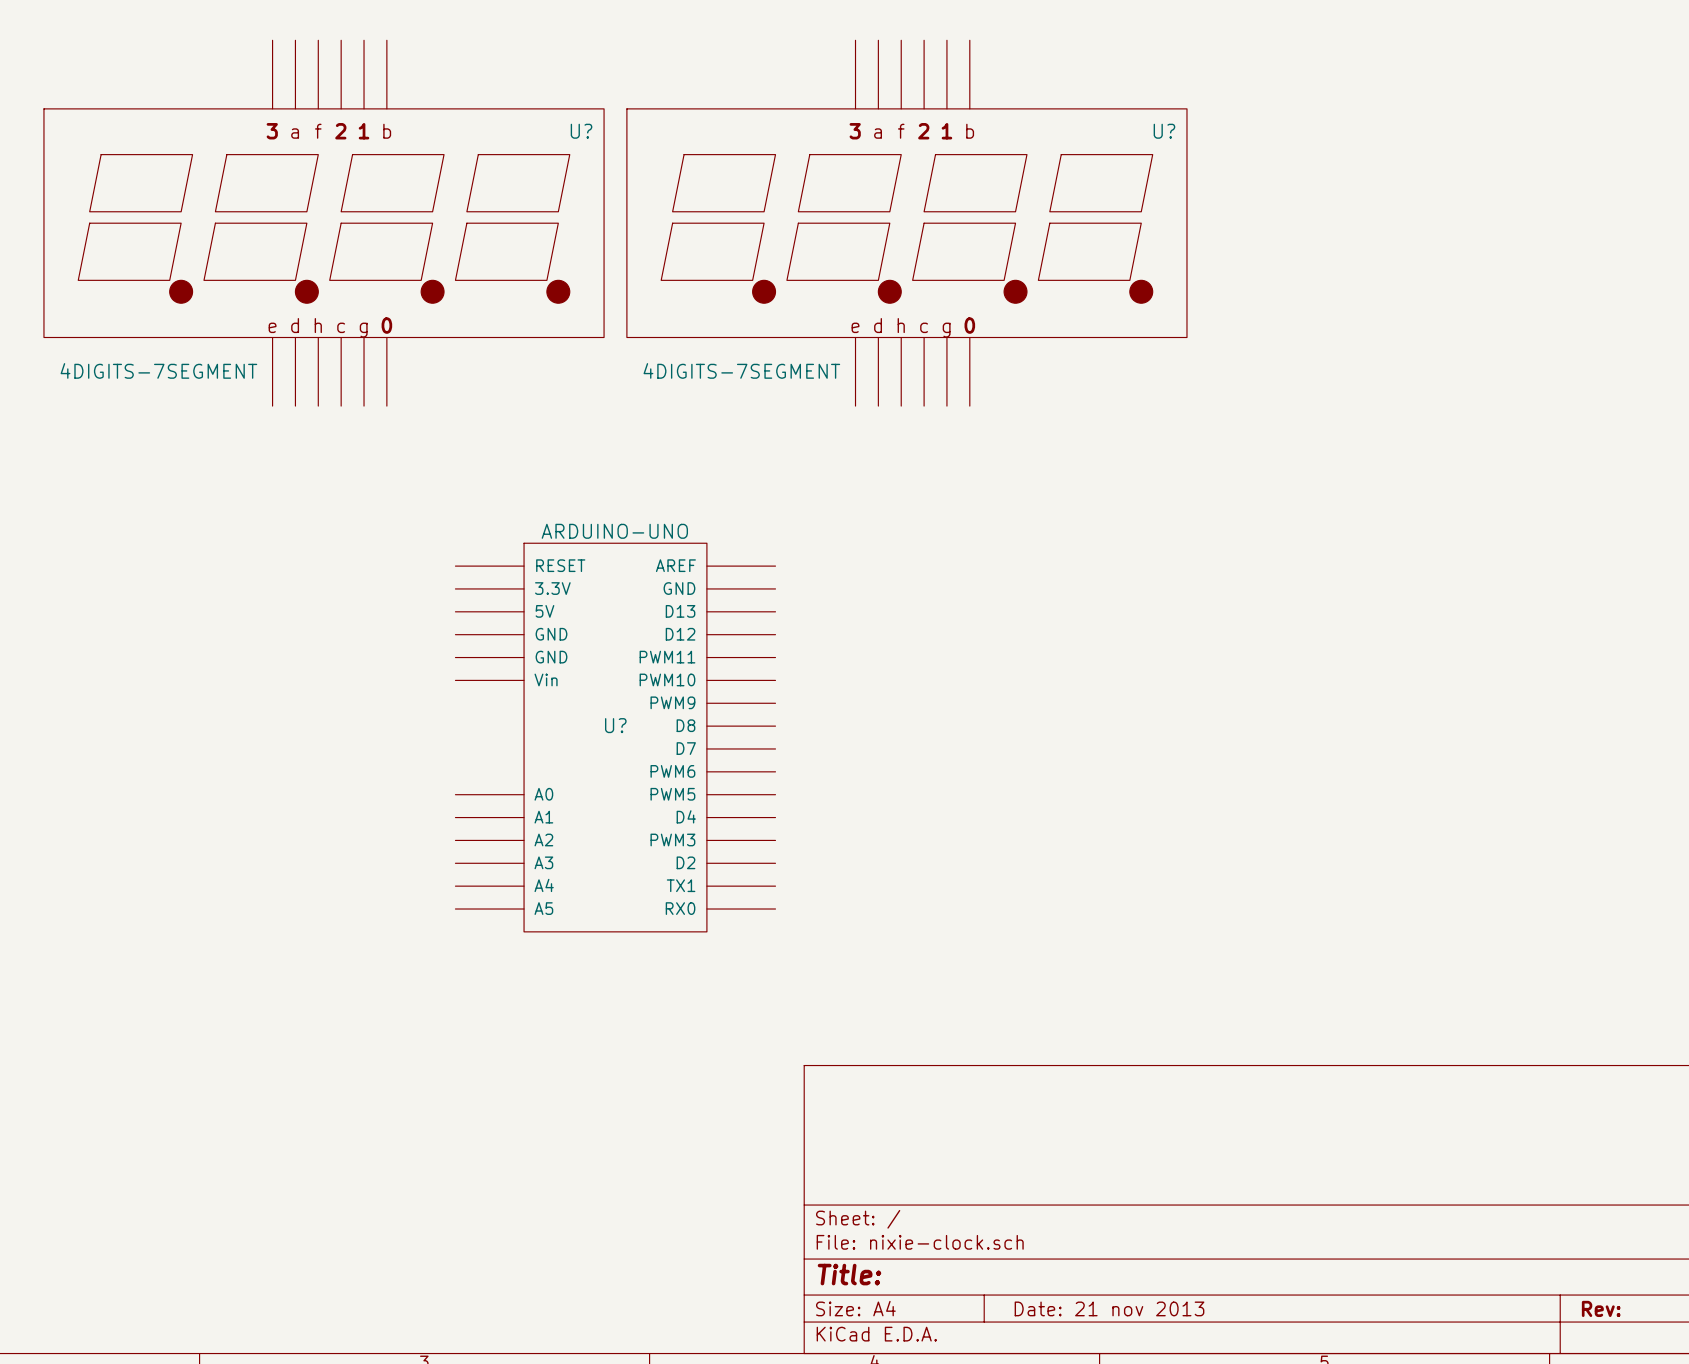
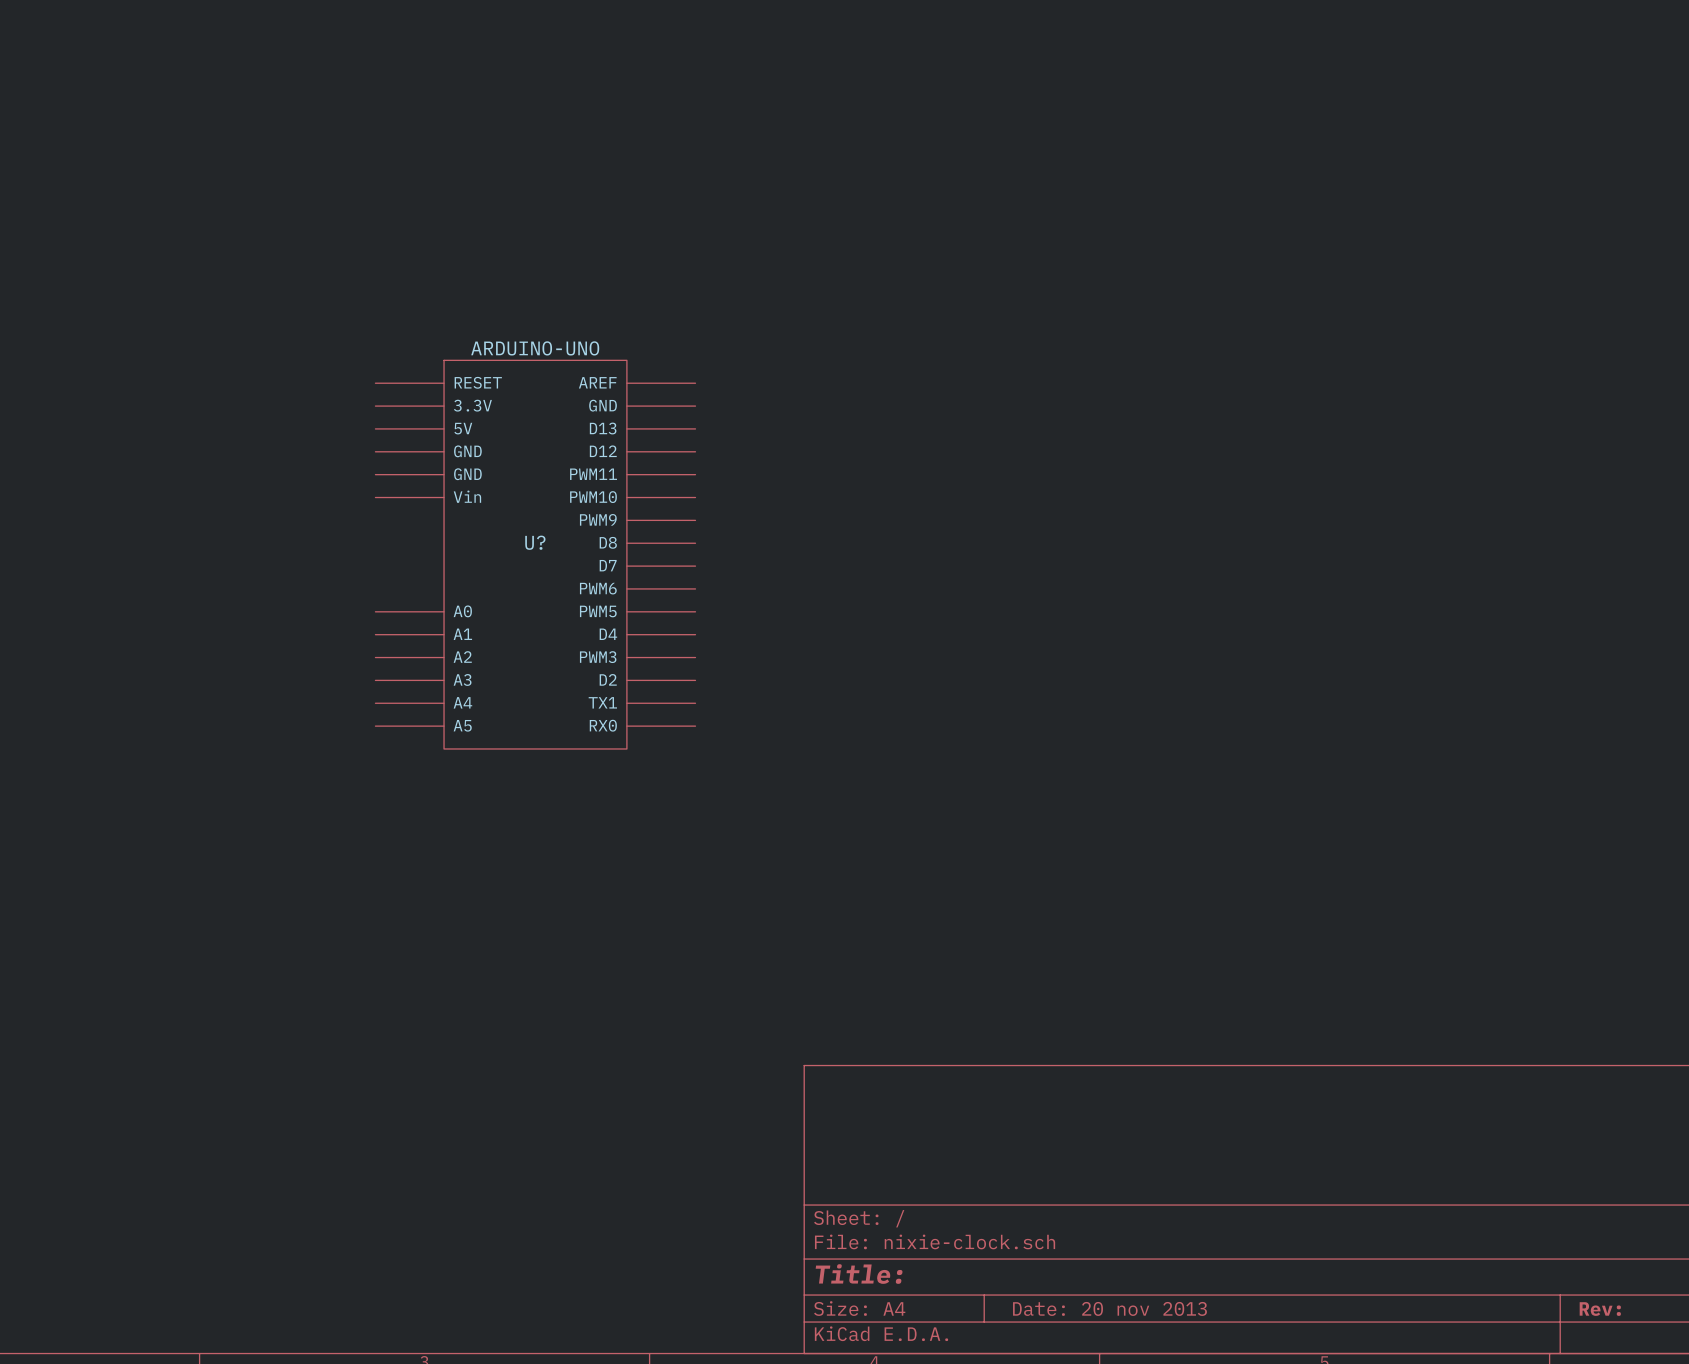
U?: 4DIGITS-7SEGMENT (324, 223) -> none
U?: 4DIGITS-7SEGMENT (906, 223) -> none
U? position: (615, 737) -> (535, 554)
title block: Date: 21 nov 2013 (1109, 1308) -> Date: 20 nov 2013 (1109, 1308)

